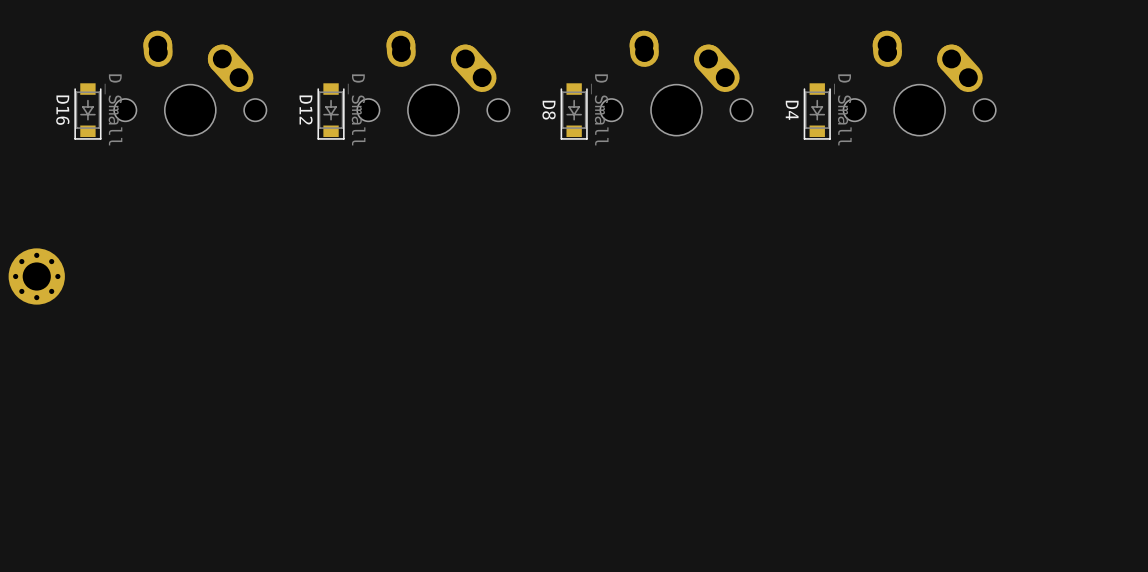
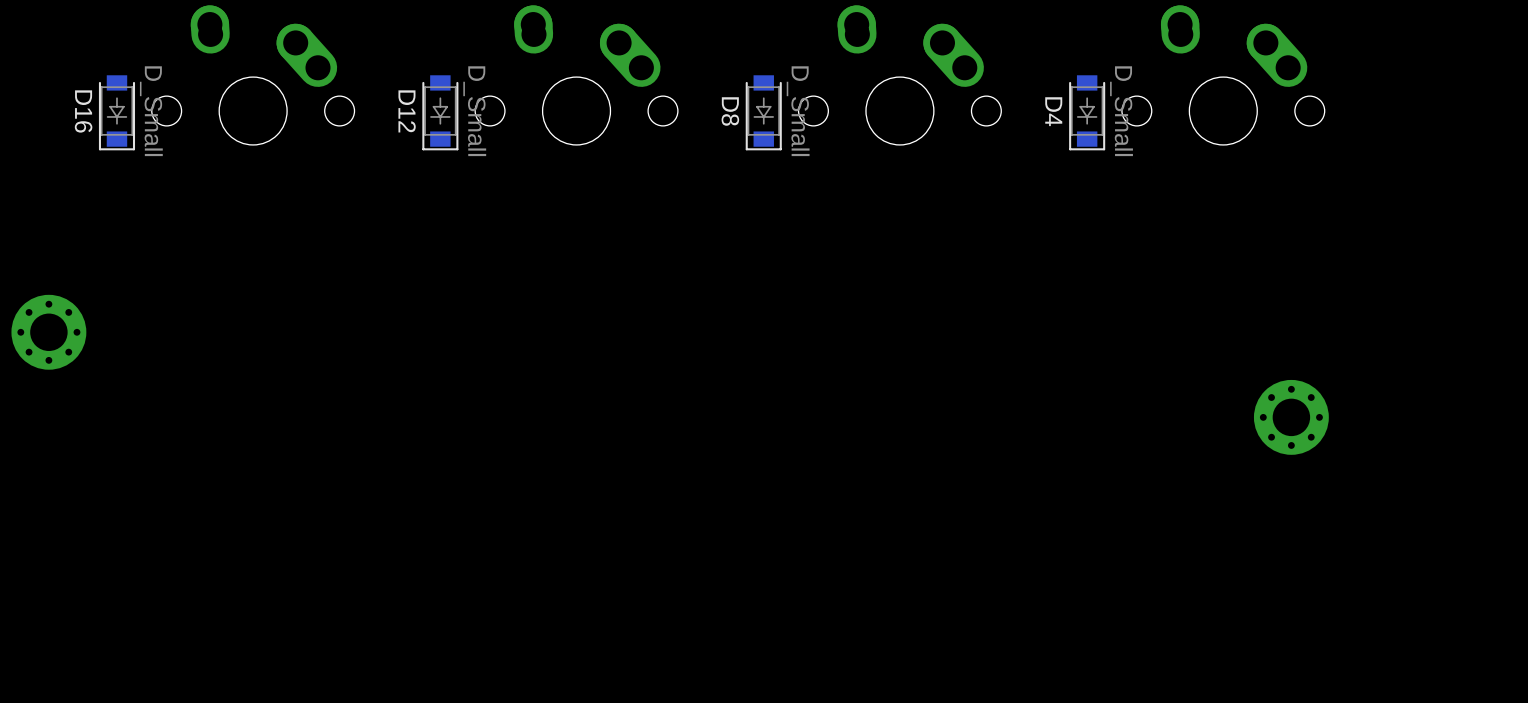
part: none -> (1291, 417)

